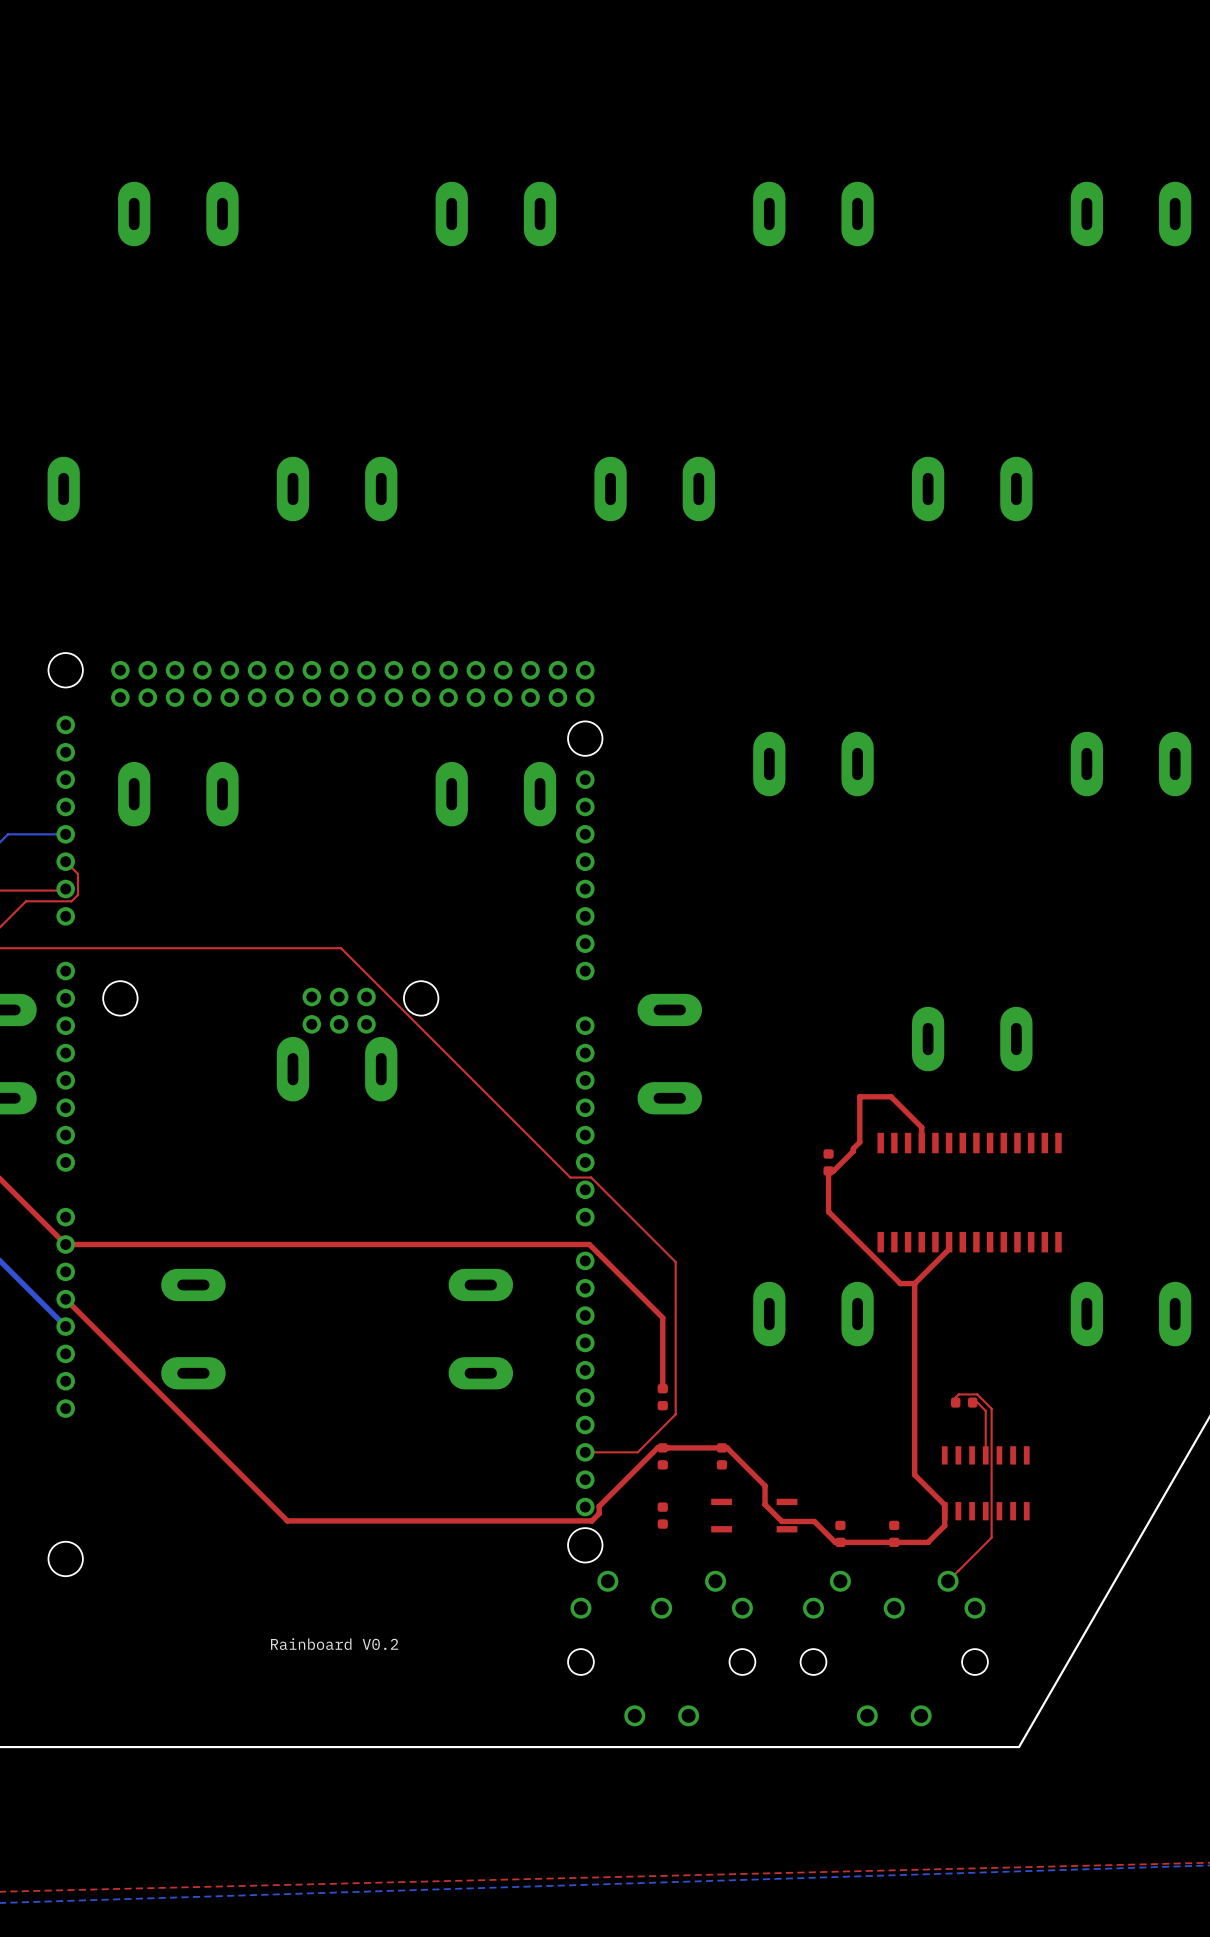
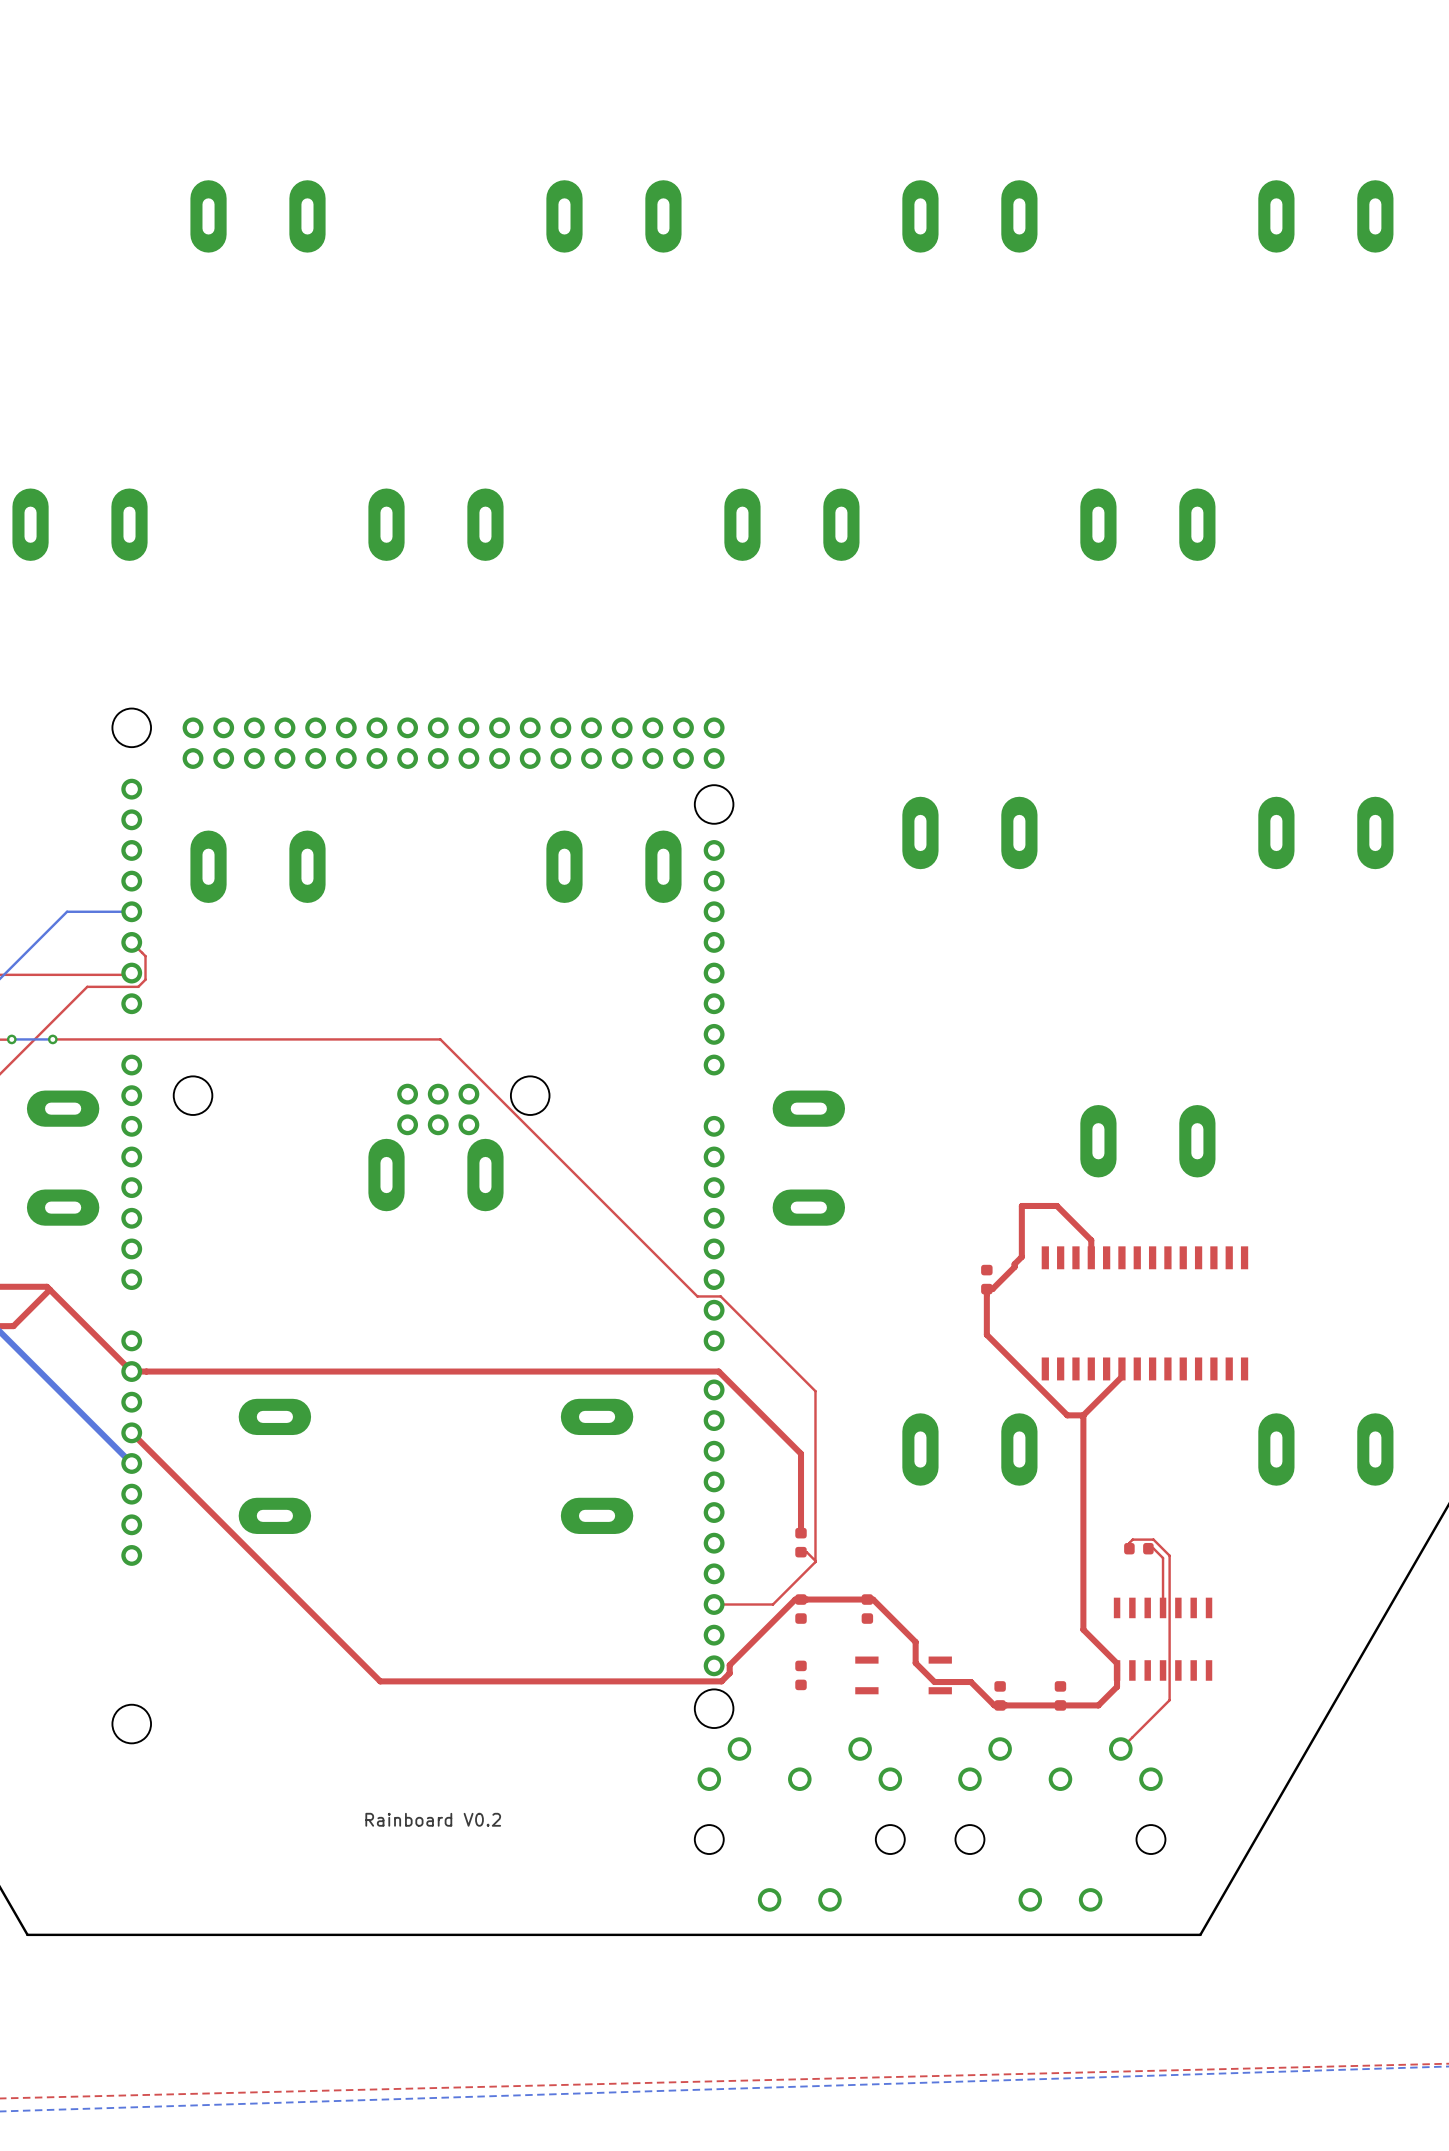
top track: none -> (801, 1552) (806, 1552) (815, 1560)

